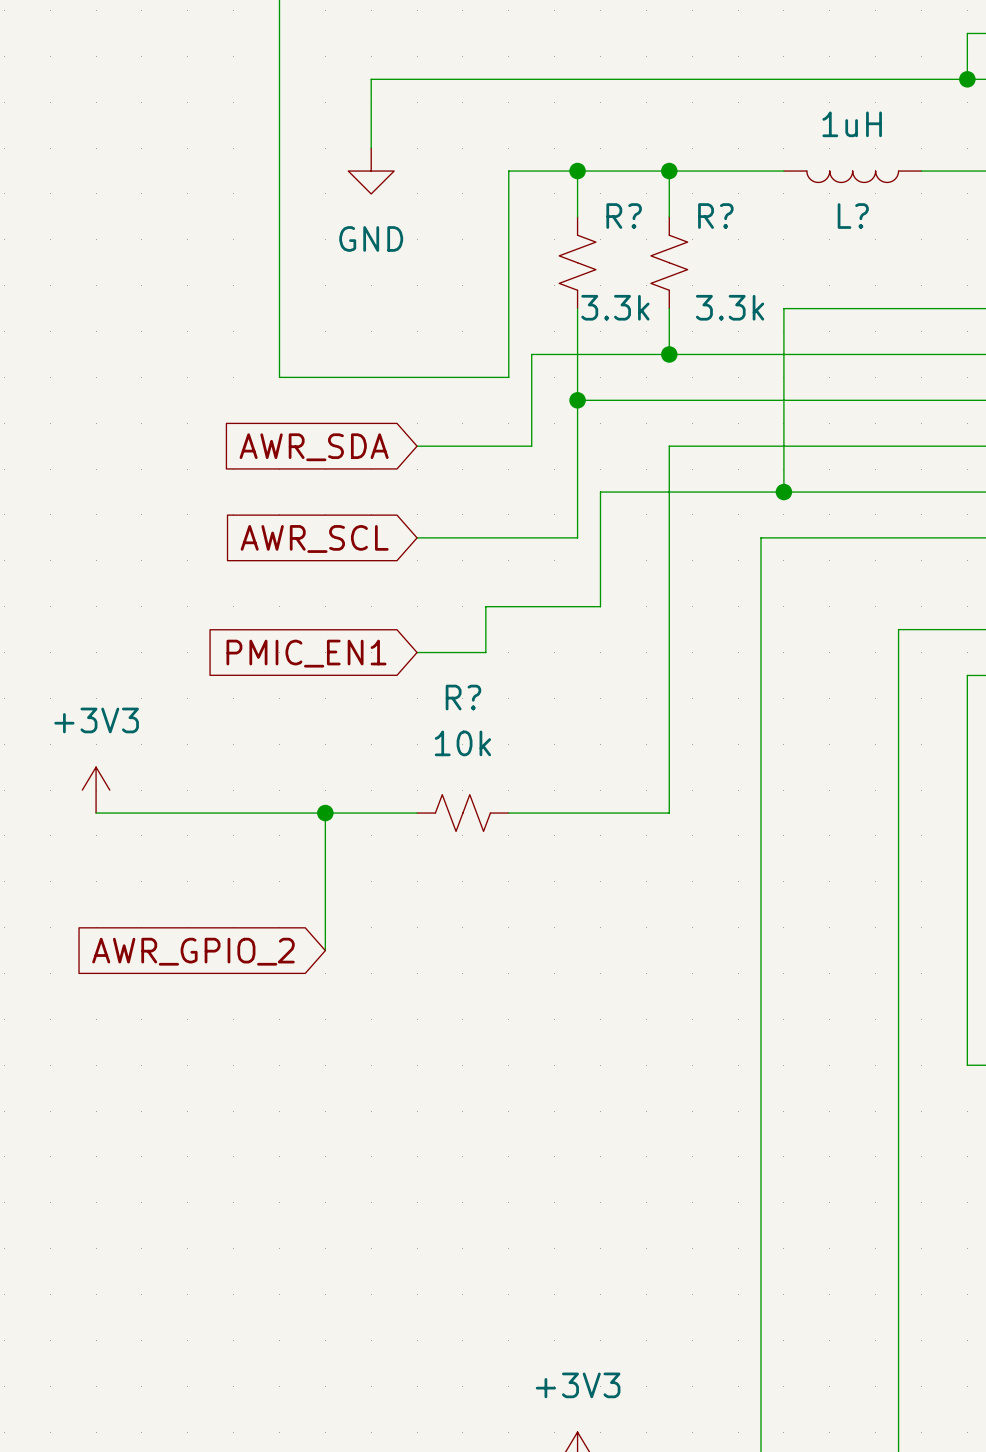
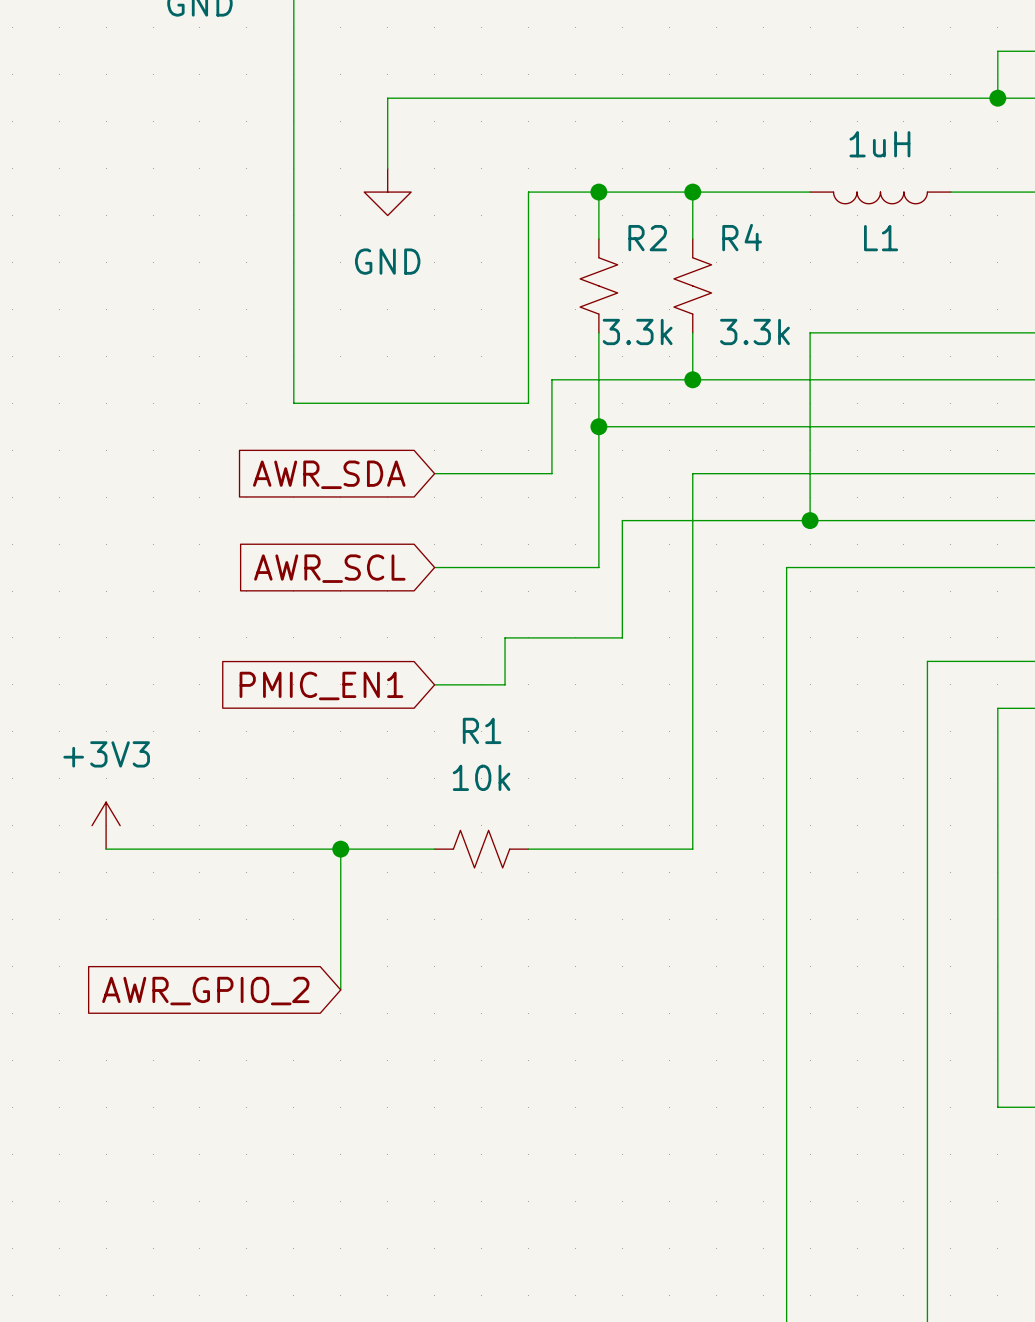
R? name: R? (624, 216) -> R2 (647, 238)
R? name: R? (715, 216) -> R4 (742, 237)
L? name: L? (853, 216) -> L1 (881, 238)
R? name: R? (463, 697) -> R1 (482, 730)

